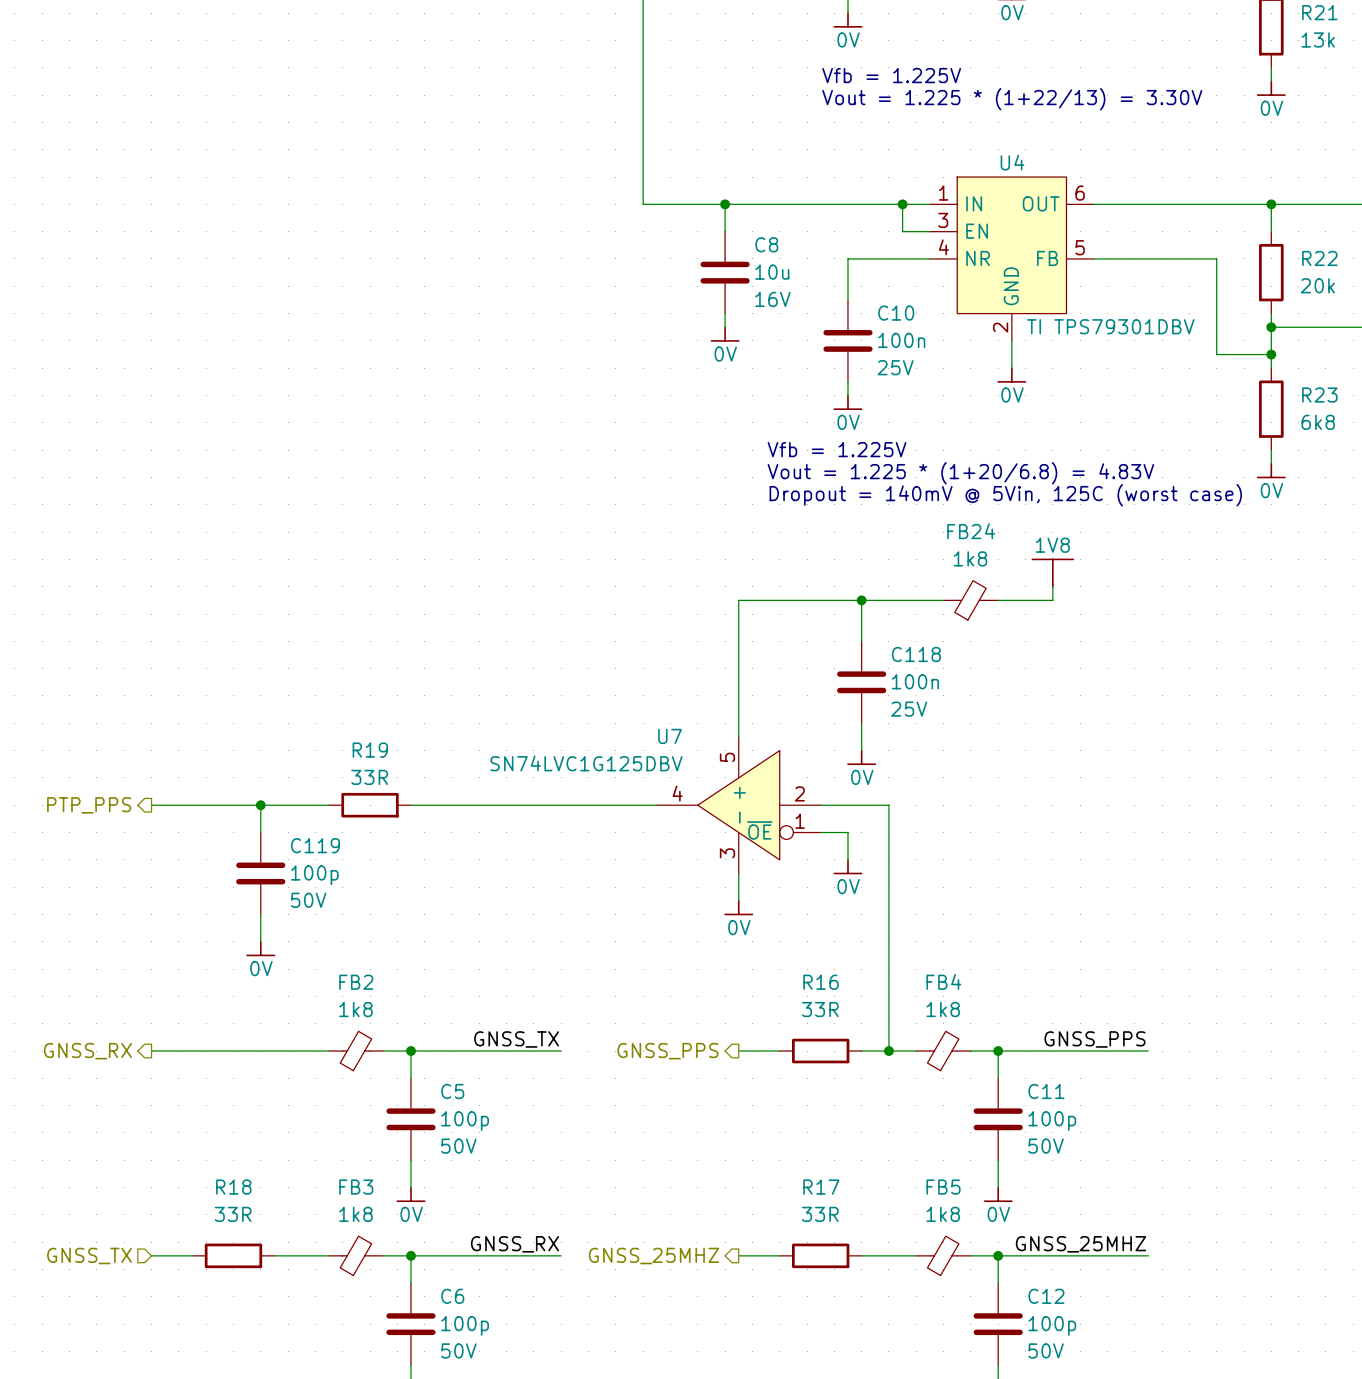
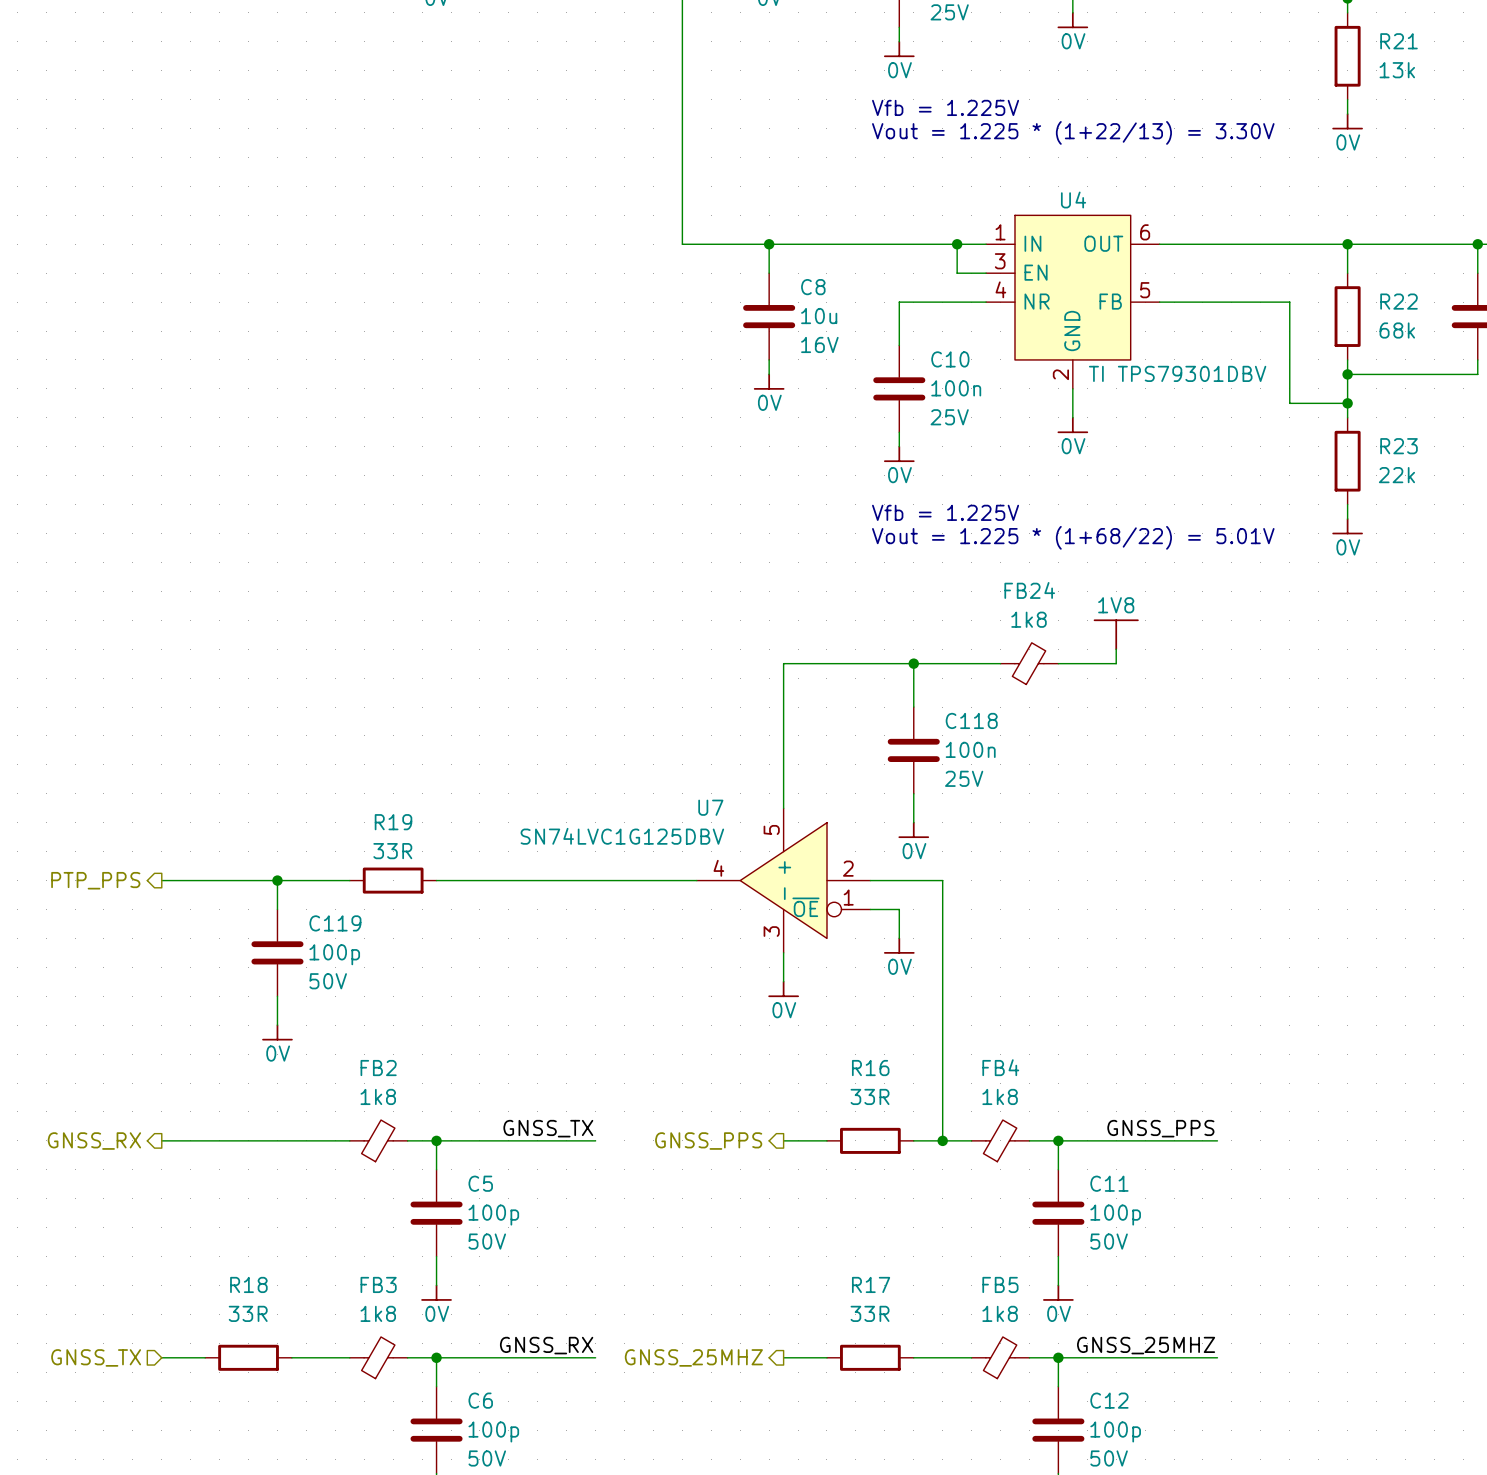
R22 value: 20k (1317, 285) -> 68k (1397, 330)
R23 value: 6k8 (1318, 422) -> 22k (1396, 475)
text position: Vfb = 1.225V (837, 449) -> Vfb = 1.225V (945, 512)
text: Vout = 1.225 * (1+20/6.8) = 4.83V (960, 473) -> Vout = 1.225 * (1+68/22) = 5.01V (1073, 537)
text: Dropout = 140mV @ 5Vin, 125C (worst case) (1005, 495) -> none

